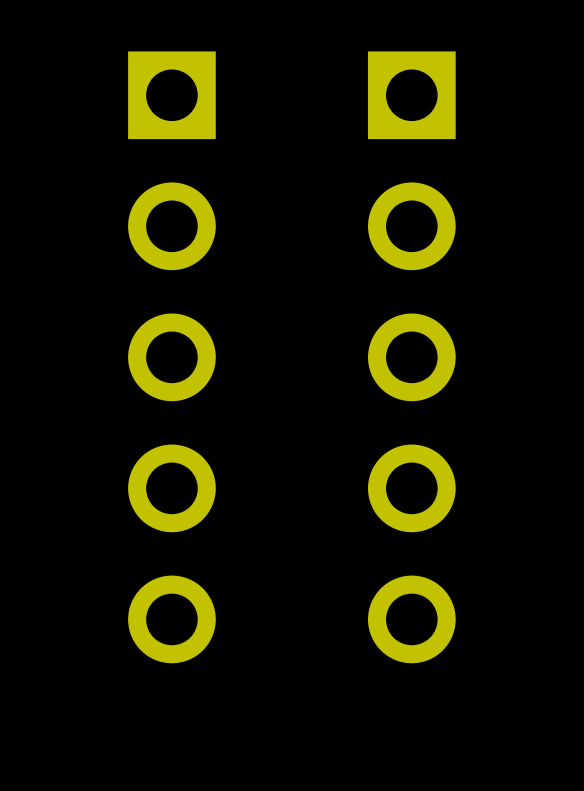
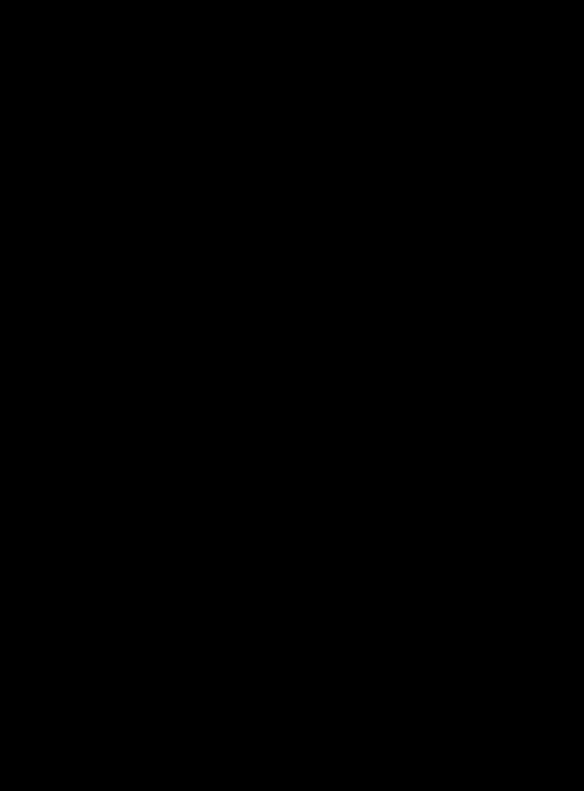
part: (171, 357) -> none
part: (411, 357) -> none

